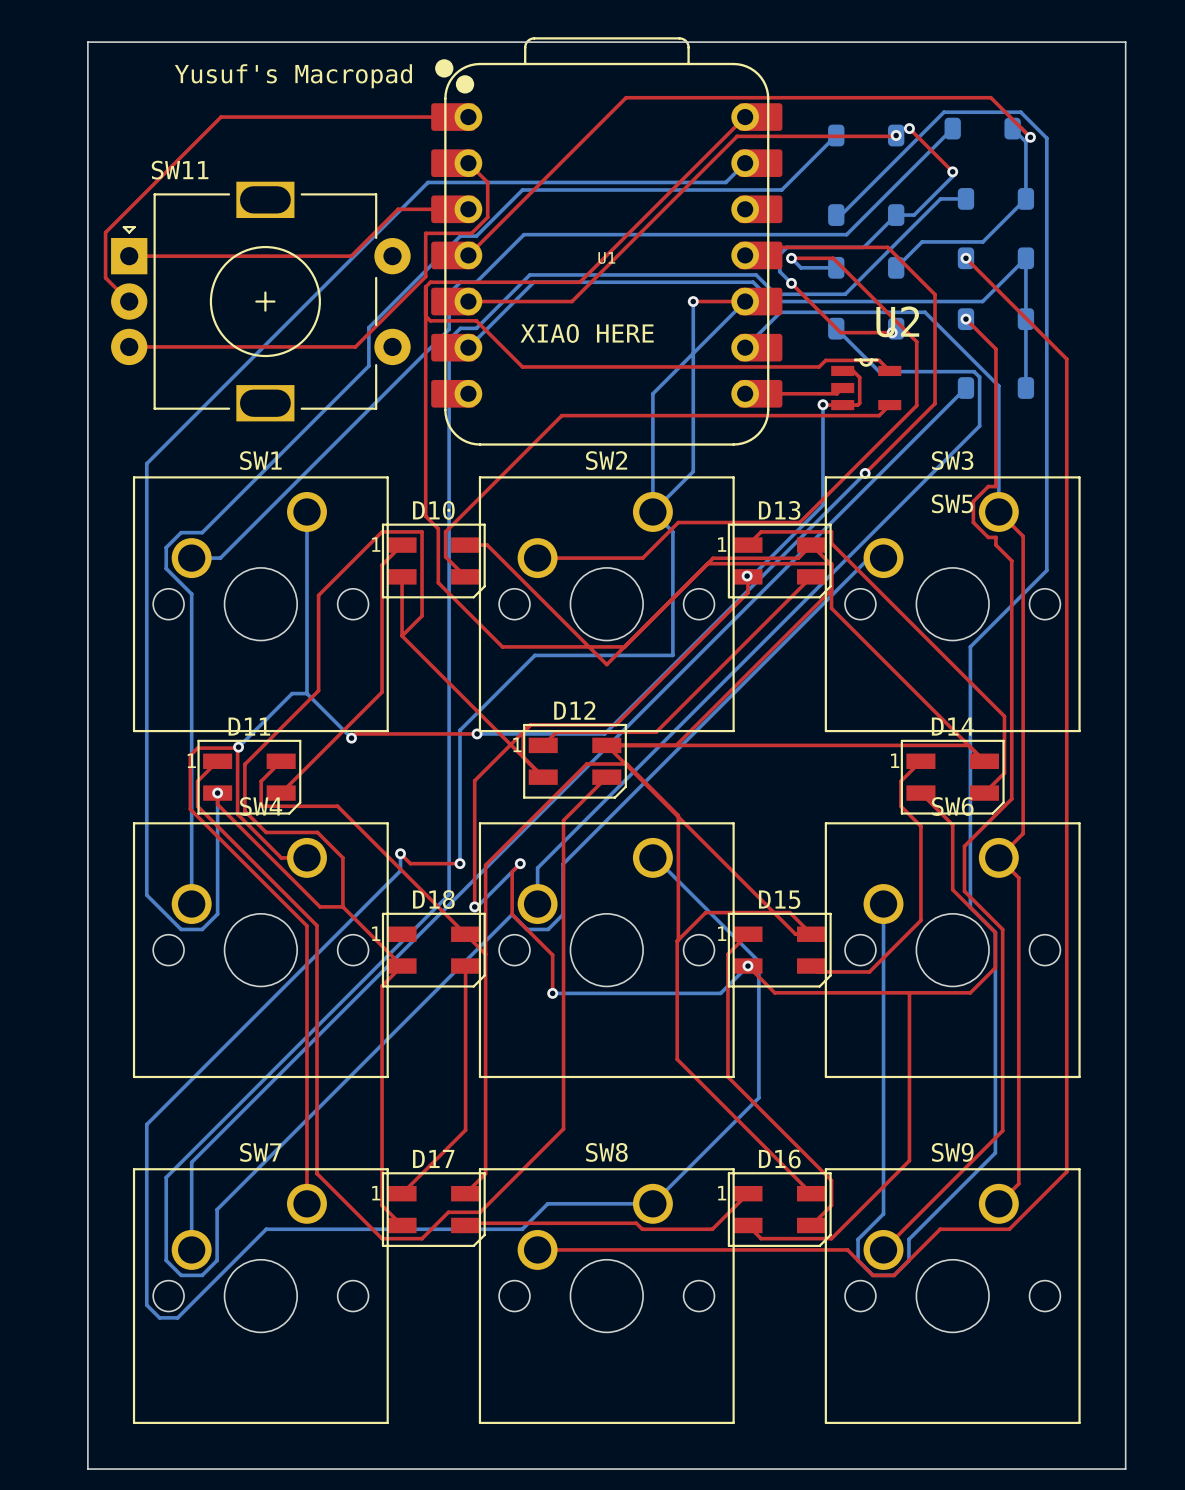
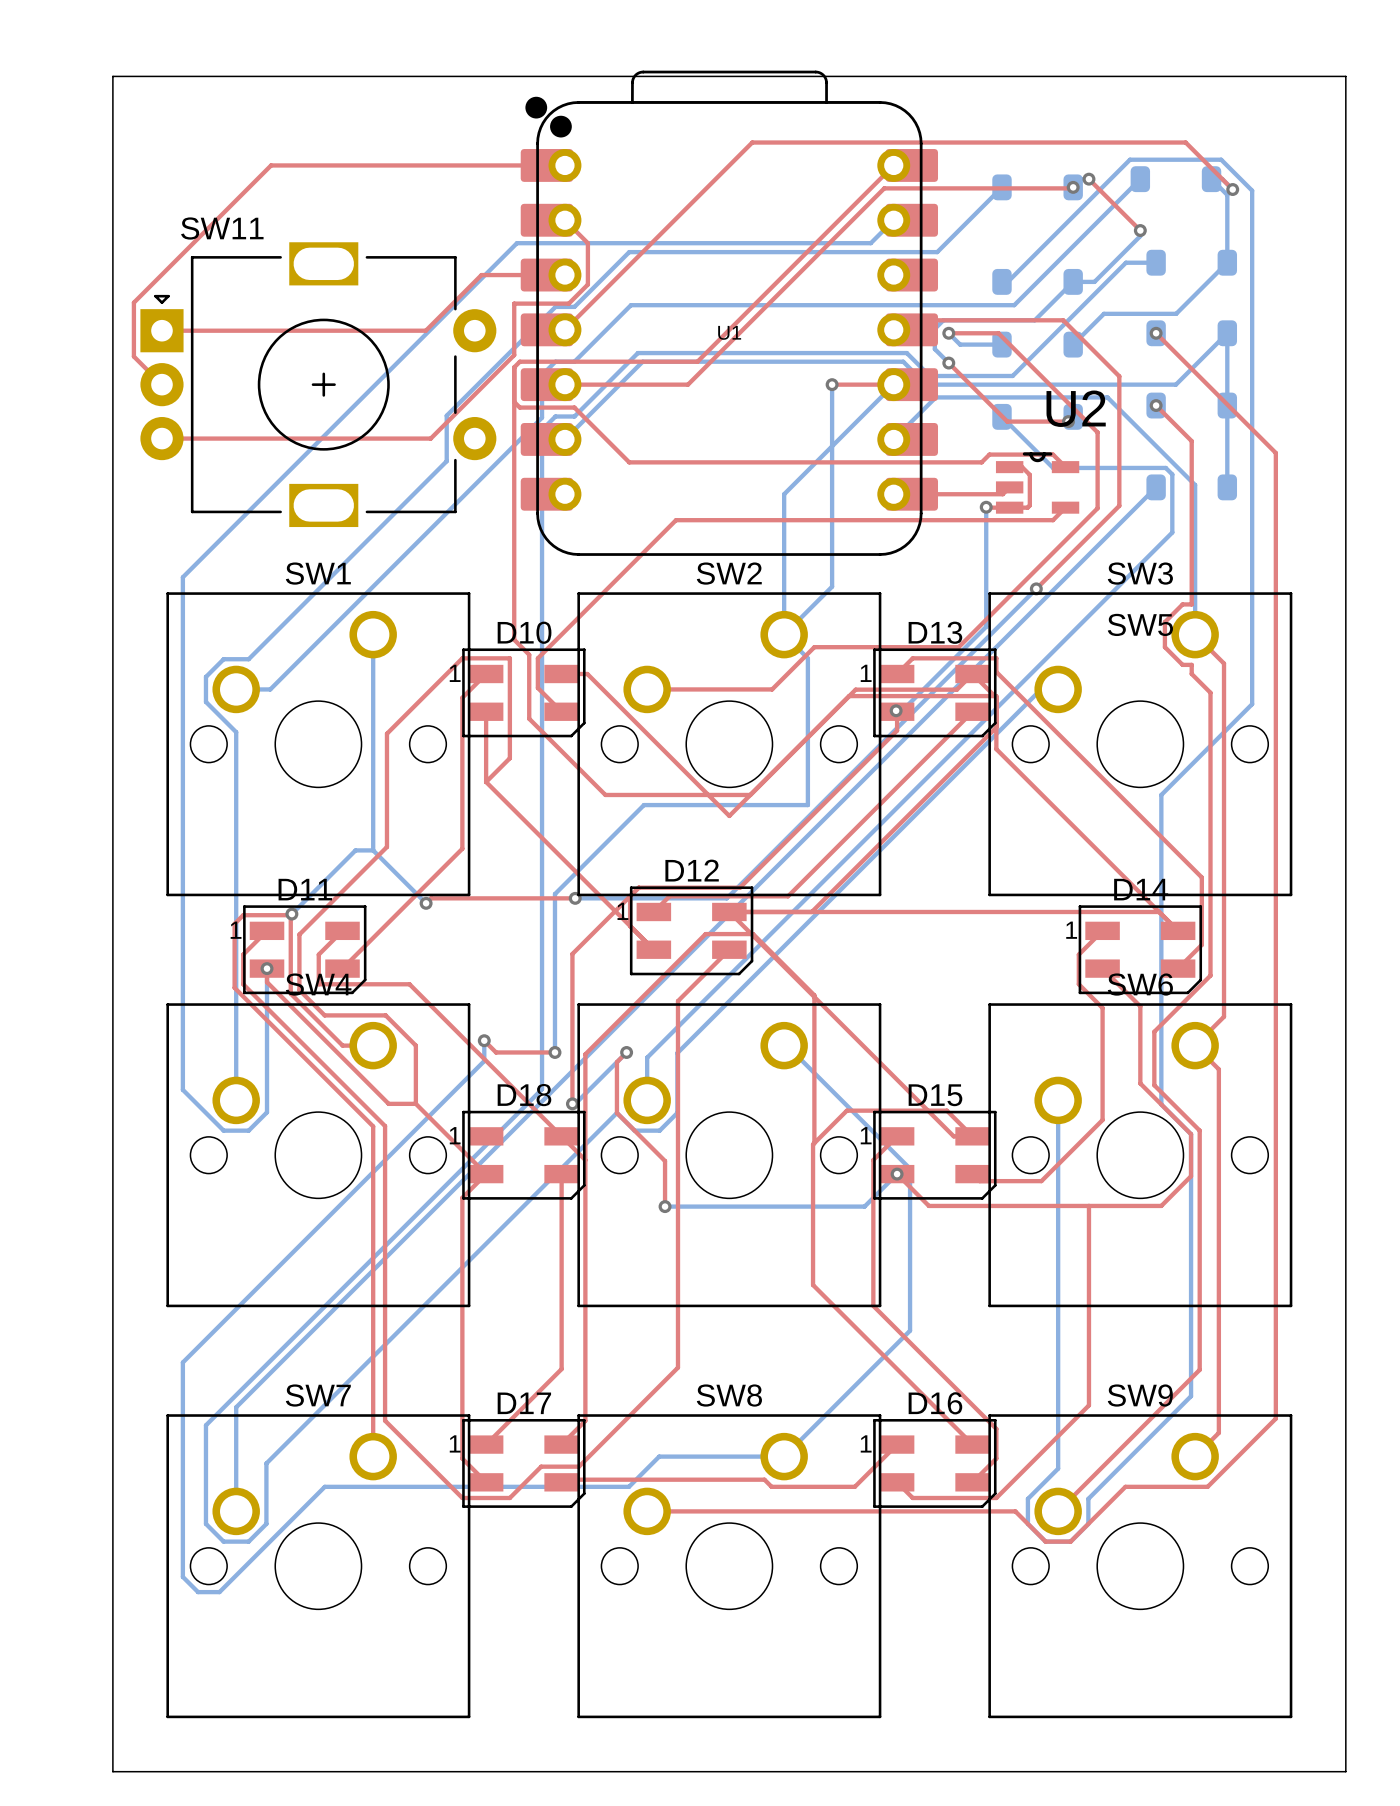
text: Yusuf's Macropad (293, 76) -> none
text: XIAO HERE (587, 333) -> none

